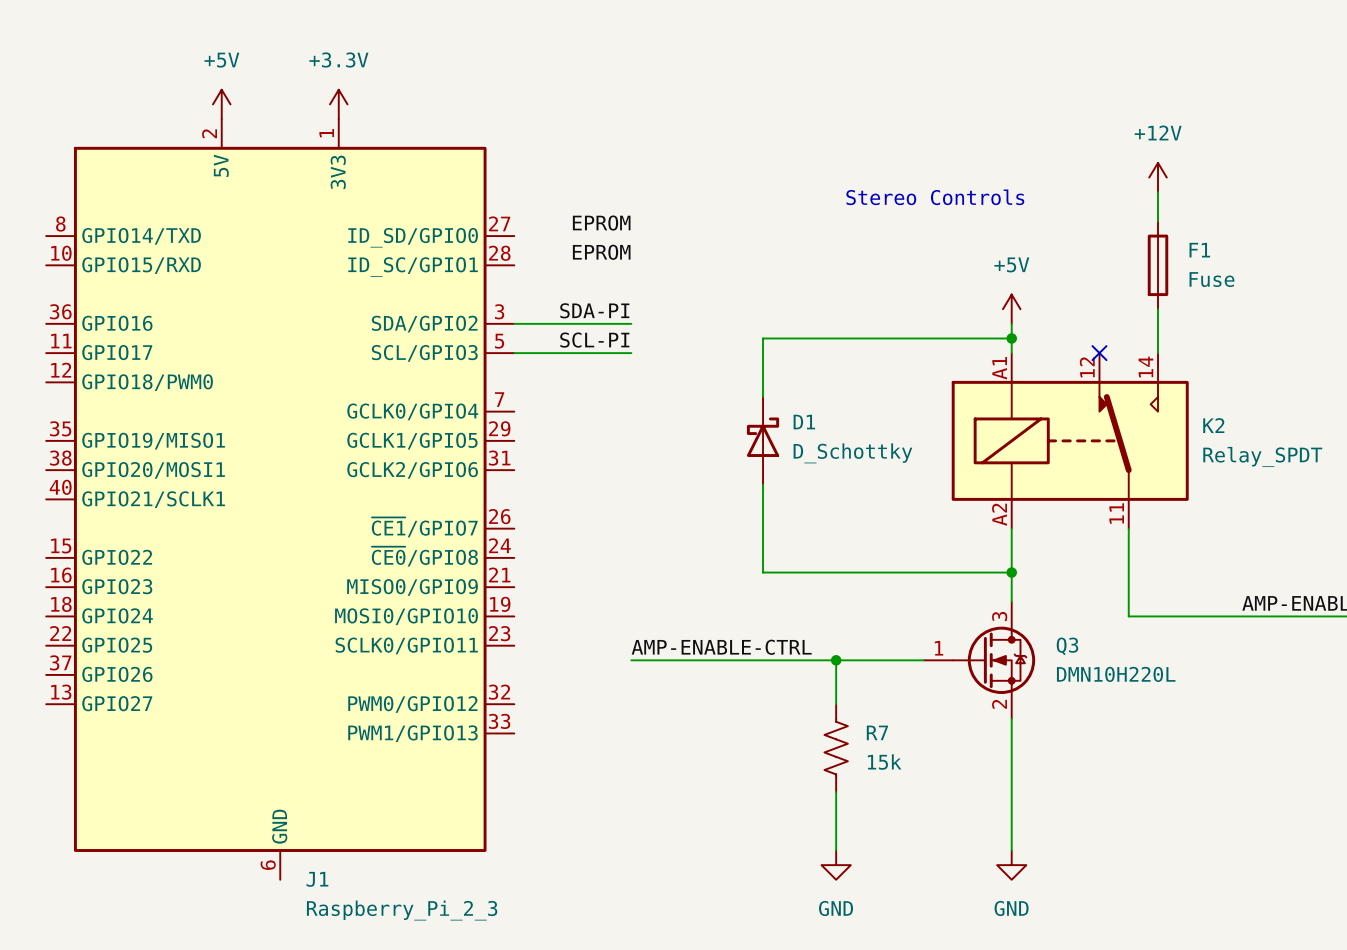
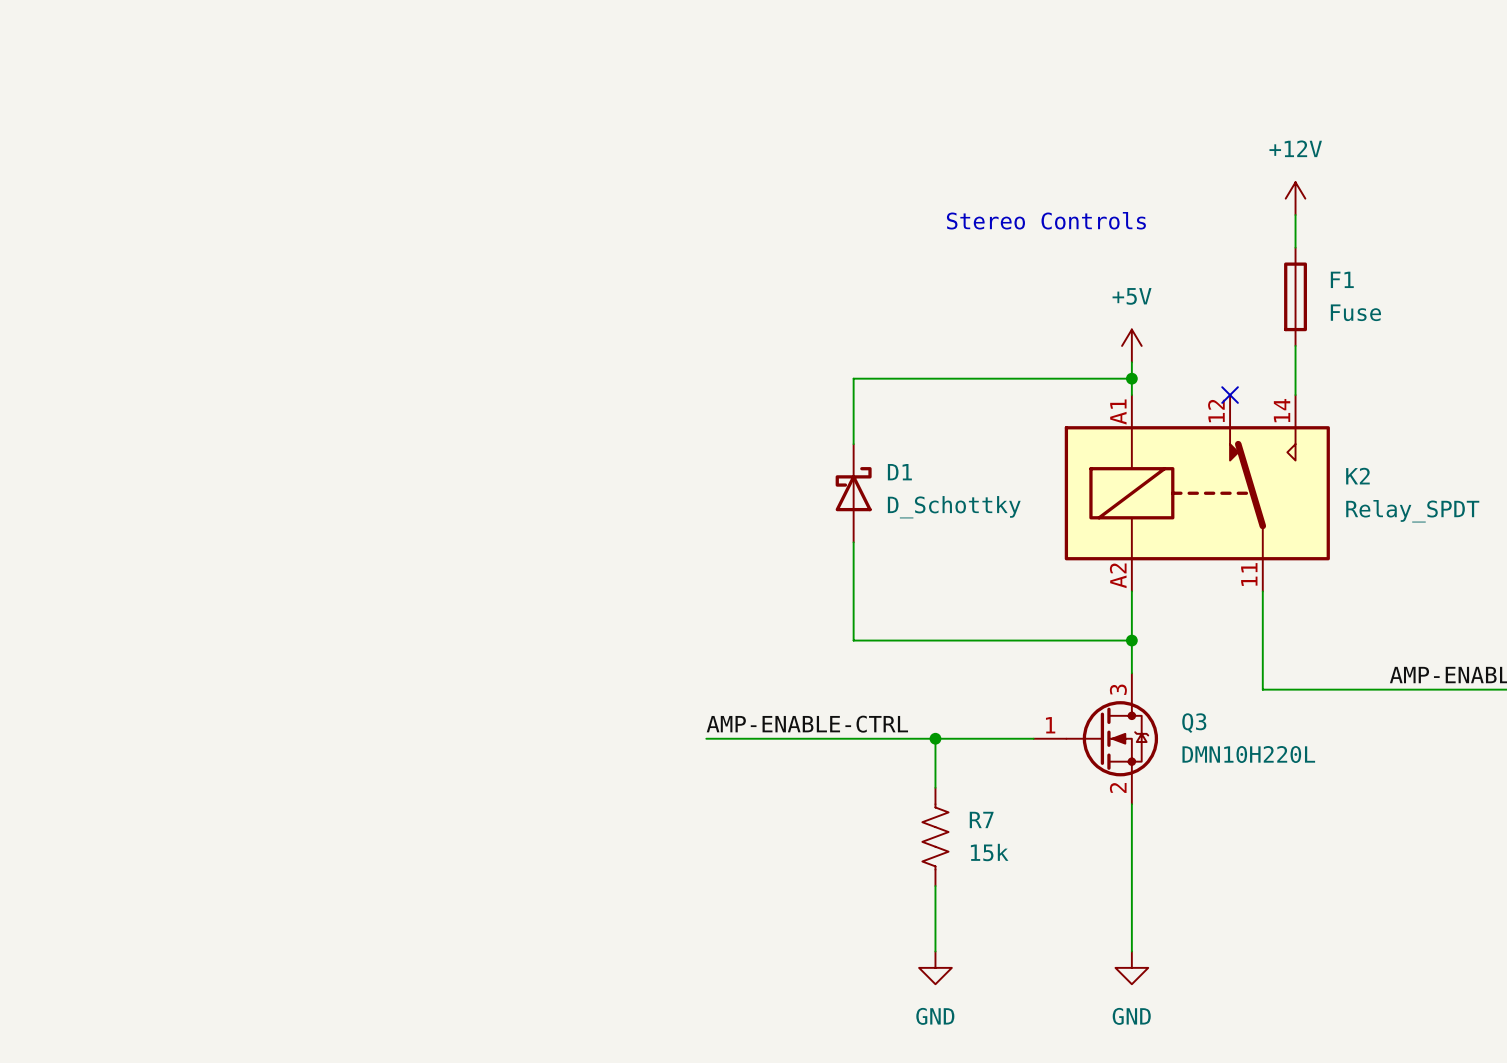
power symbol: +5V (221, 104) -> none
power symbol: +3.3V (338, 104) -> none
label: EPROM (601, 223) -> none
label: EPROM (601, 252) -> none
label: SDA-PI (594, 310) -> none
wire: (514, 323) (631, 323) -> none
label: SCL-PI (594, 340) -> none
wire: (514, 353) (631, 353) -> none
J1: Raspberry_Pi_2_3 (280, 499) -> none

